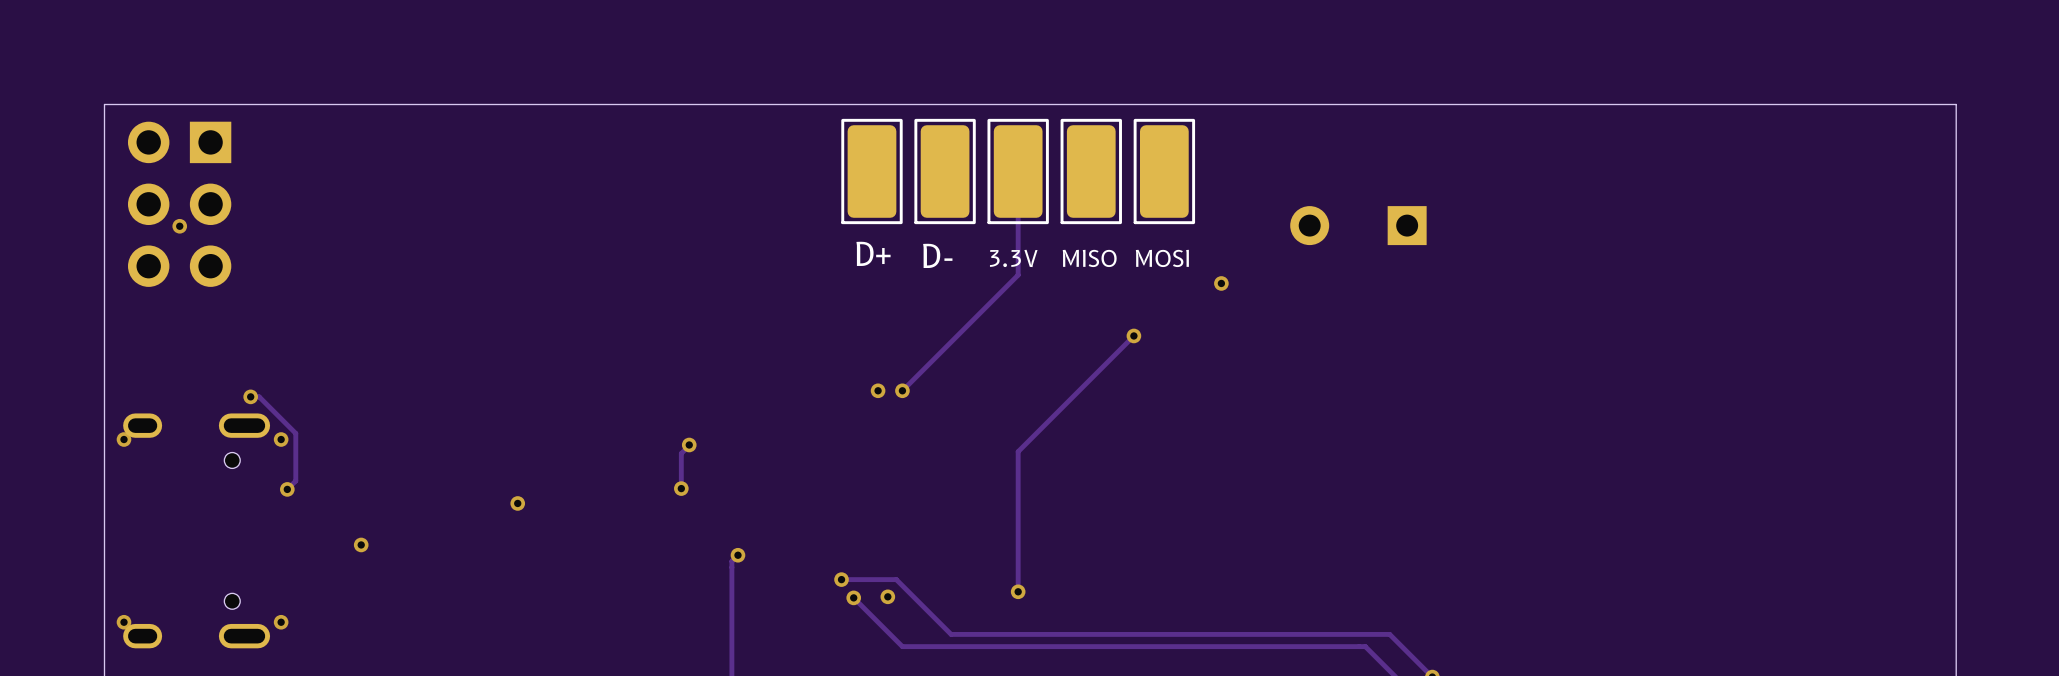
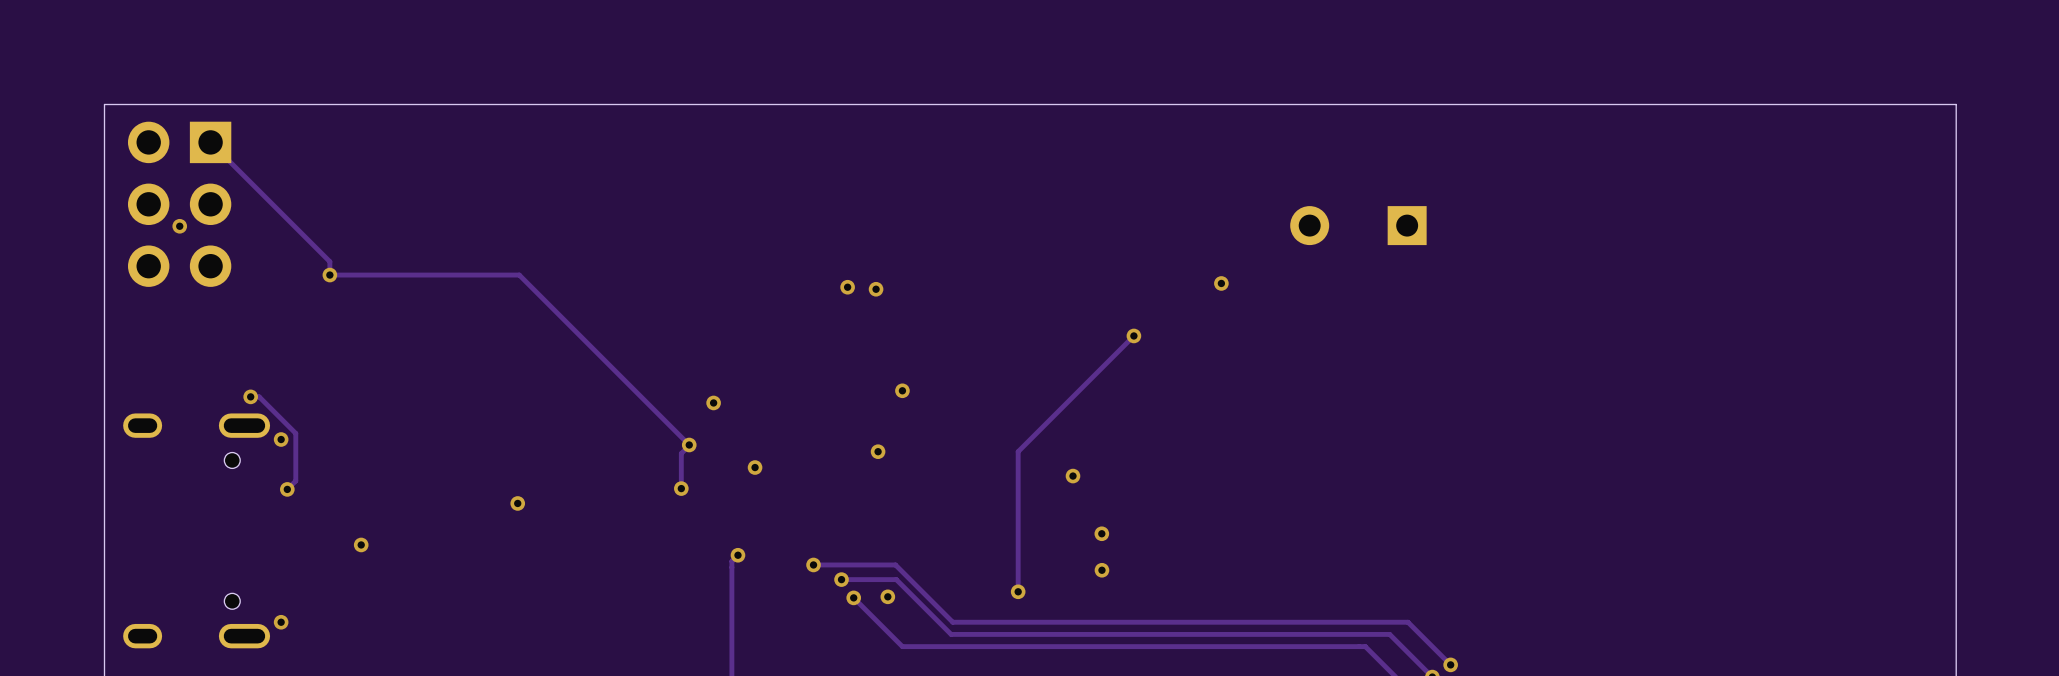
track: none -> (210, 142) (329, 261) (329, 275) (519, 275) (689, 444)
part: (871, 171) -> none
part: (945, 171) -> none
track: (1018, 171) (1018, 275) (902, 390) -> none
part: (1018, 171) -> none
part: (1091, 171) -> none
part: (1164, 171) -> none
text: D+ (873, 253) -> none
text: D- (937, 255) -> none
text: 3.3V (1013, 258) -> none
text: MISO (1089, 258) -> none
text: MOSI (1162, 258) -> none
via: none -> (329, 275)
via: none -> (847, 287)
via: none -> (876, 289)
via: (878, 390) -> none
via: none -> (713, 402)
via: (123, 439) -> none
via: none -> (878, 451)
via: none -> (755, 467)
via: none -> (1072, 476)
via: none -> (1101, 533)
via: none -> (813, 564)
track: none -> (811, 567) (813, 564) (895, 564) (952, 622) (1408, 622) (1450, 664)
via: none -> (1101, 570)
via: (123, 622) -> none
via: none -> (1450, 664)

